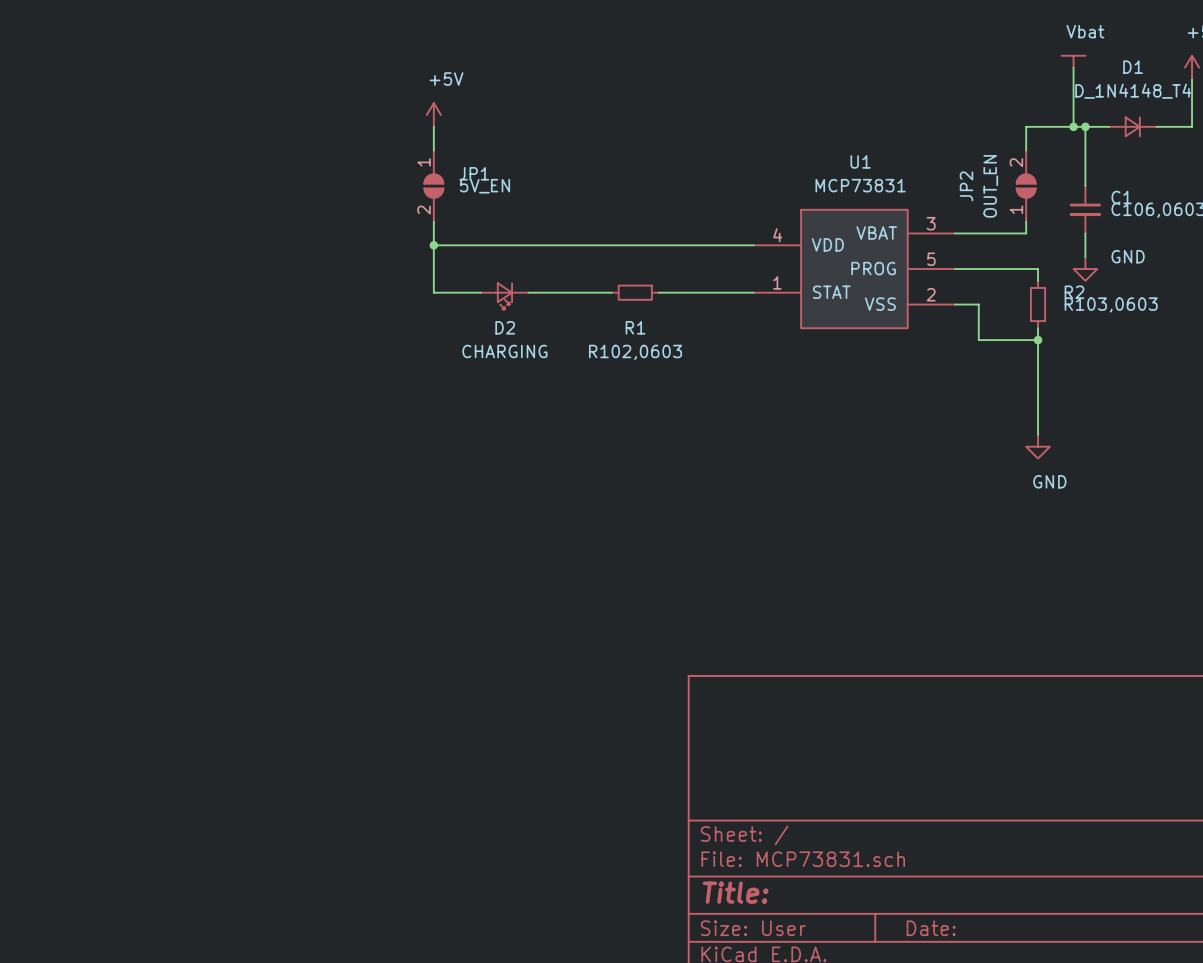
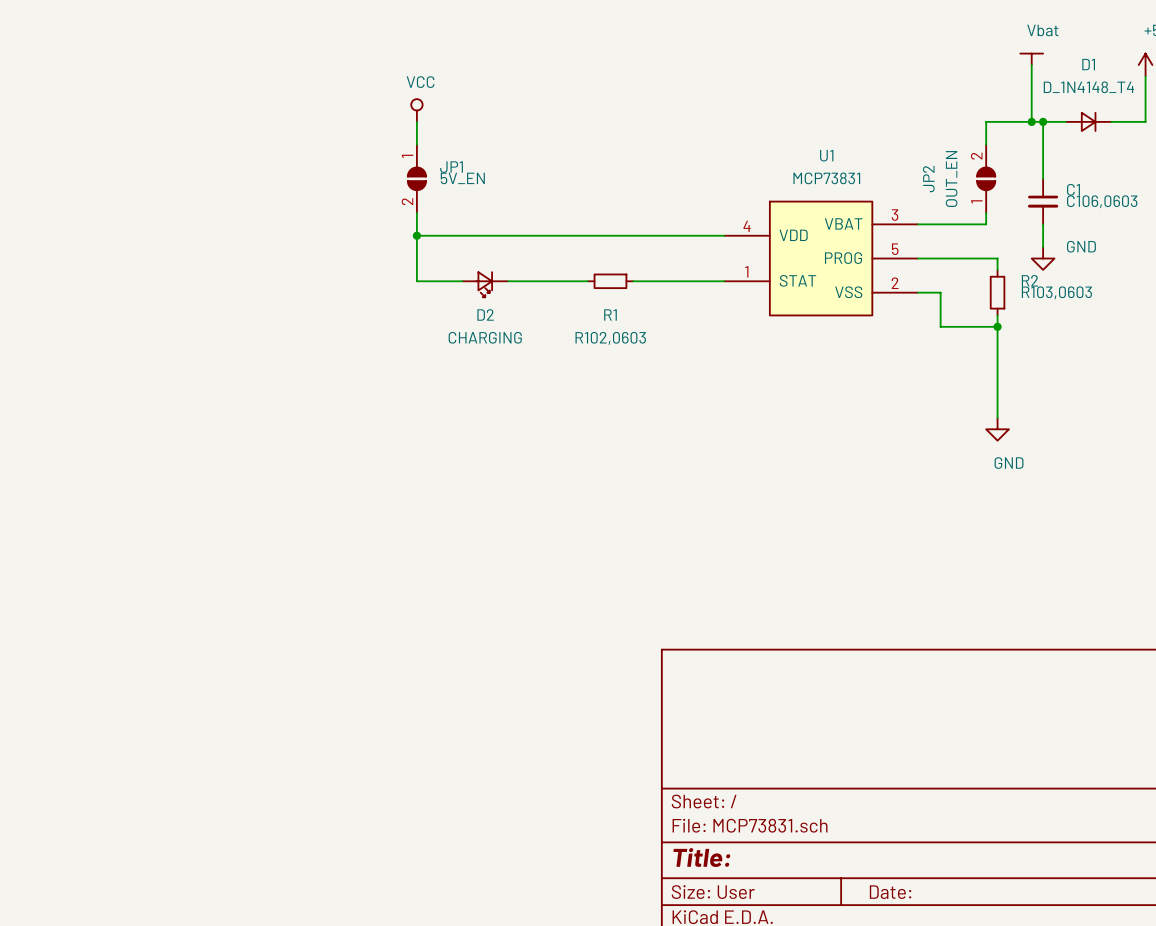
power symbol: +5V (433, 115) -> VCC (416, 110)

